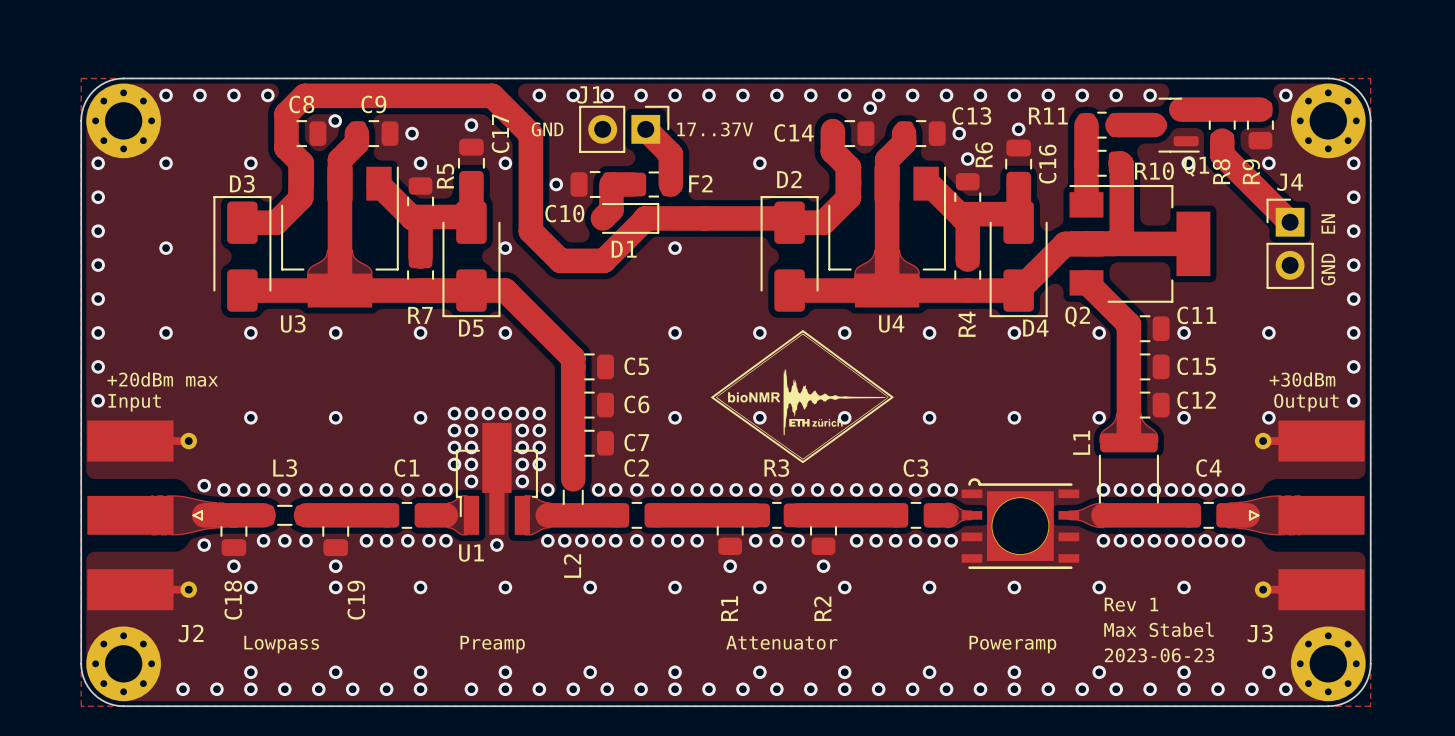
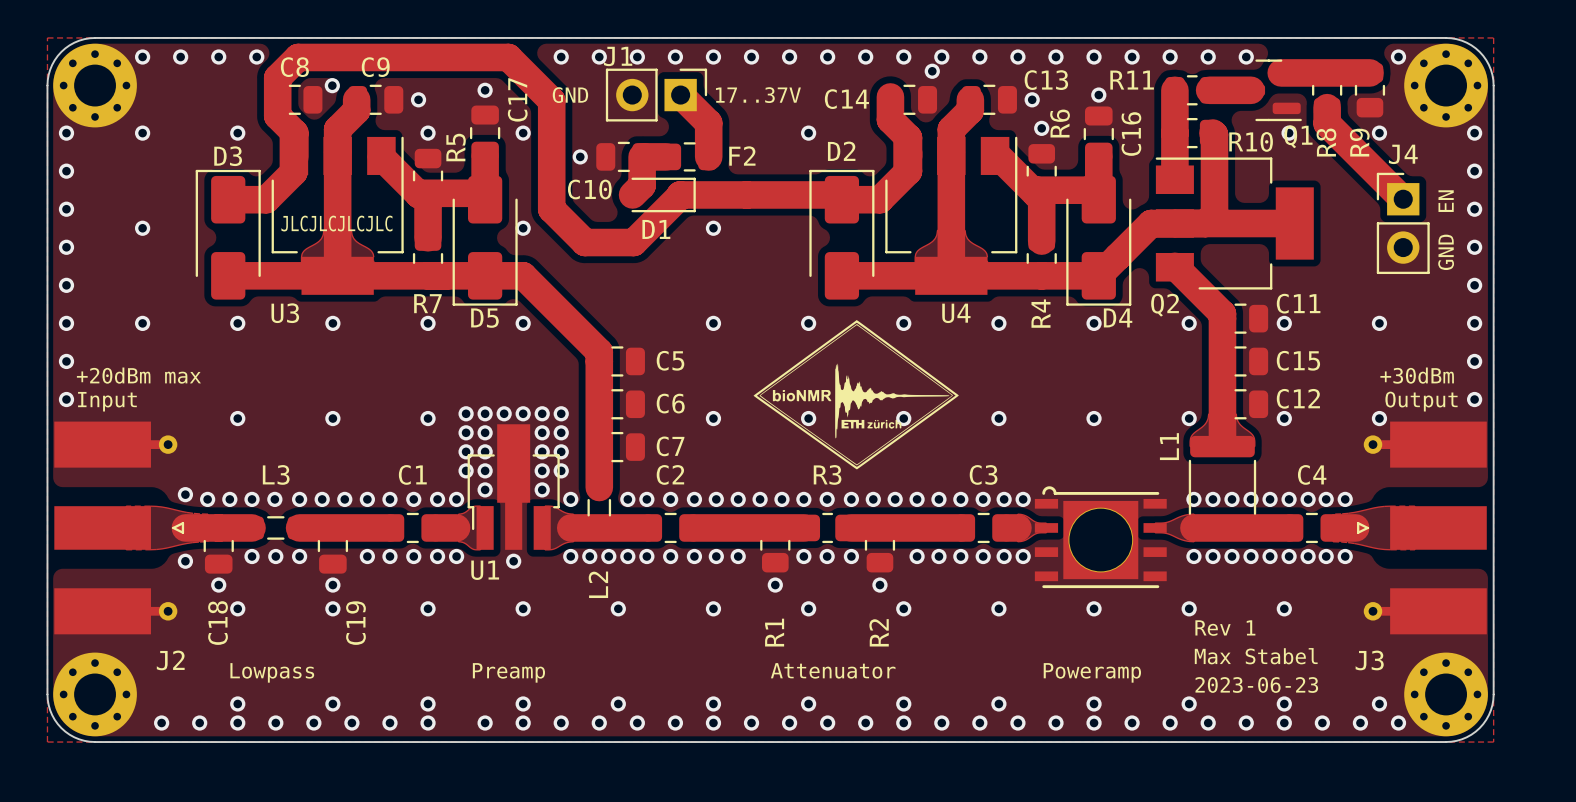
text: none -> JLCJLCJLCJLC (336, 223)

